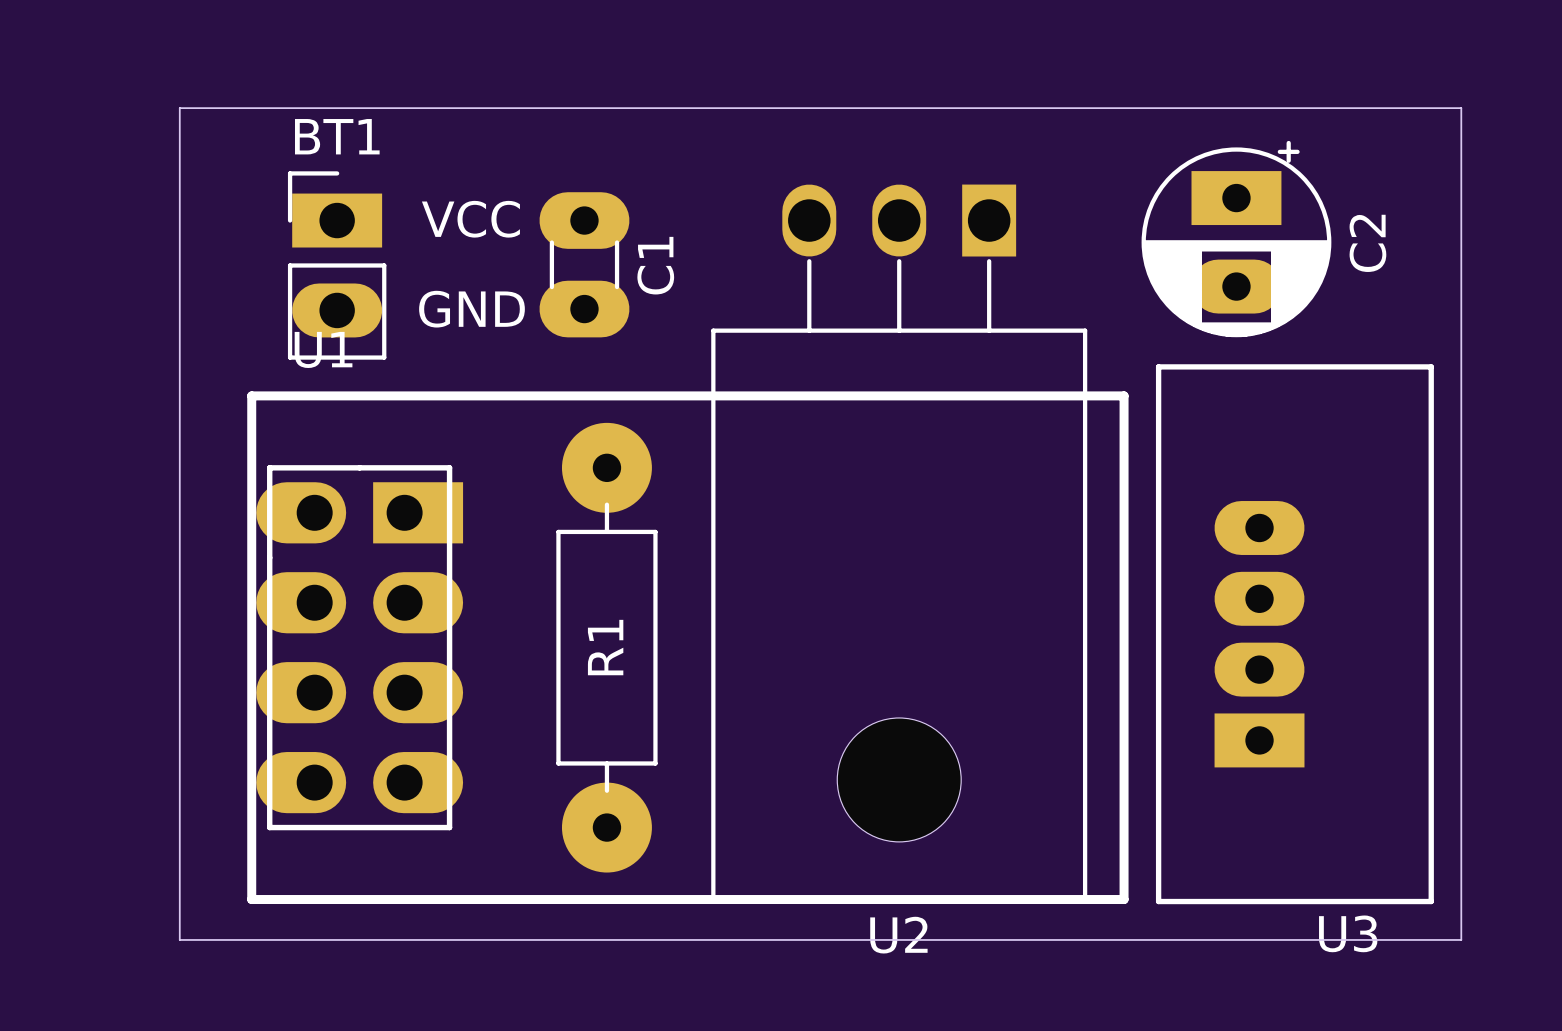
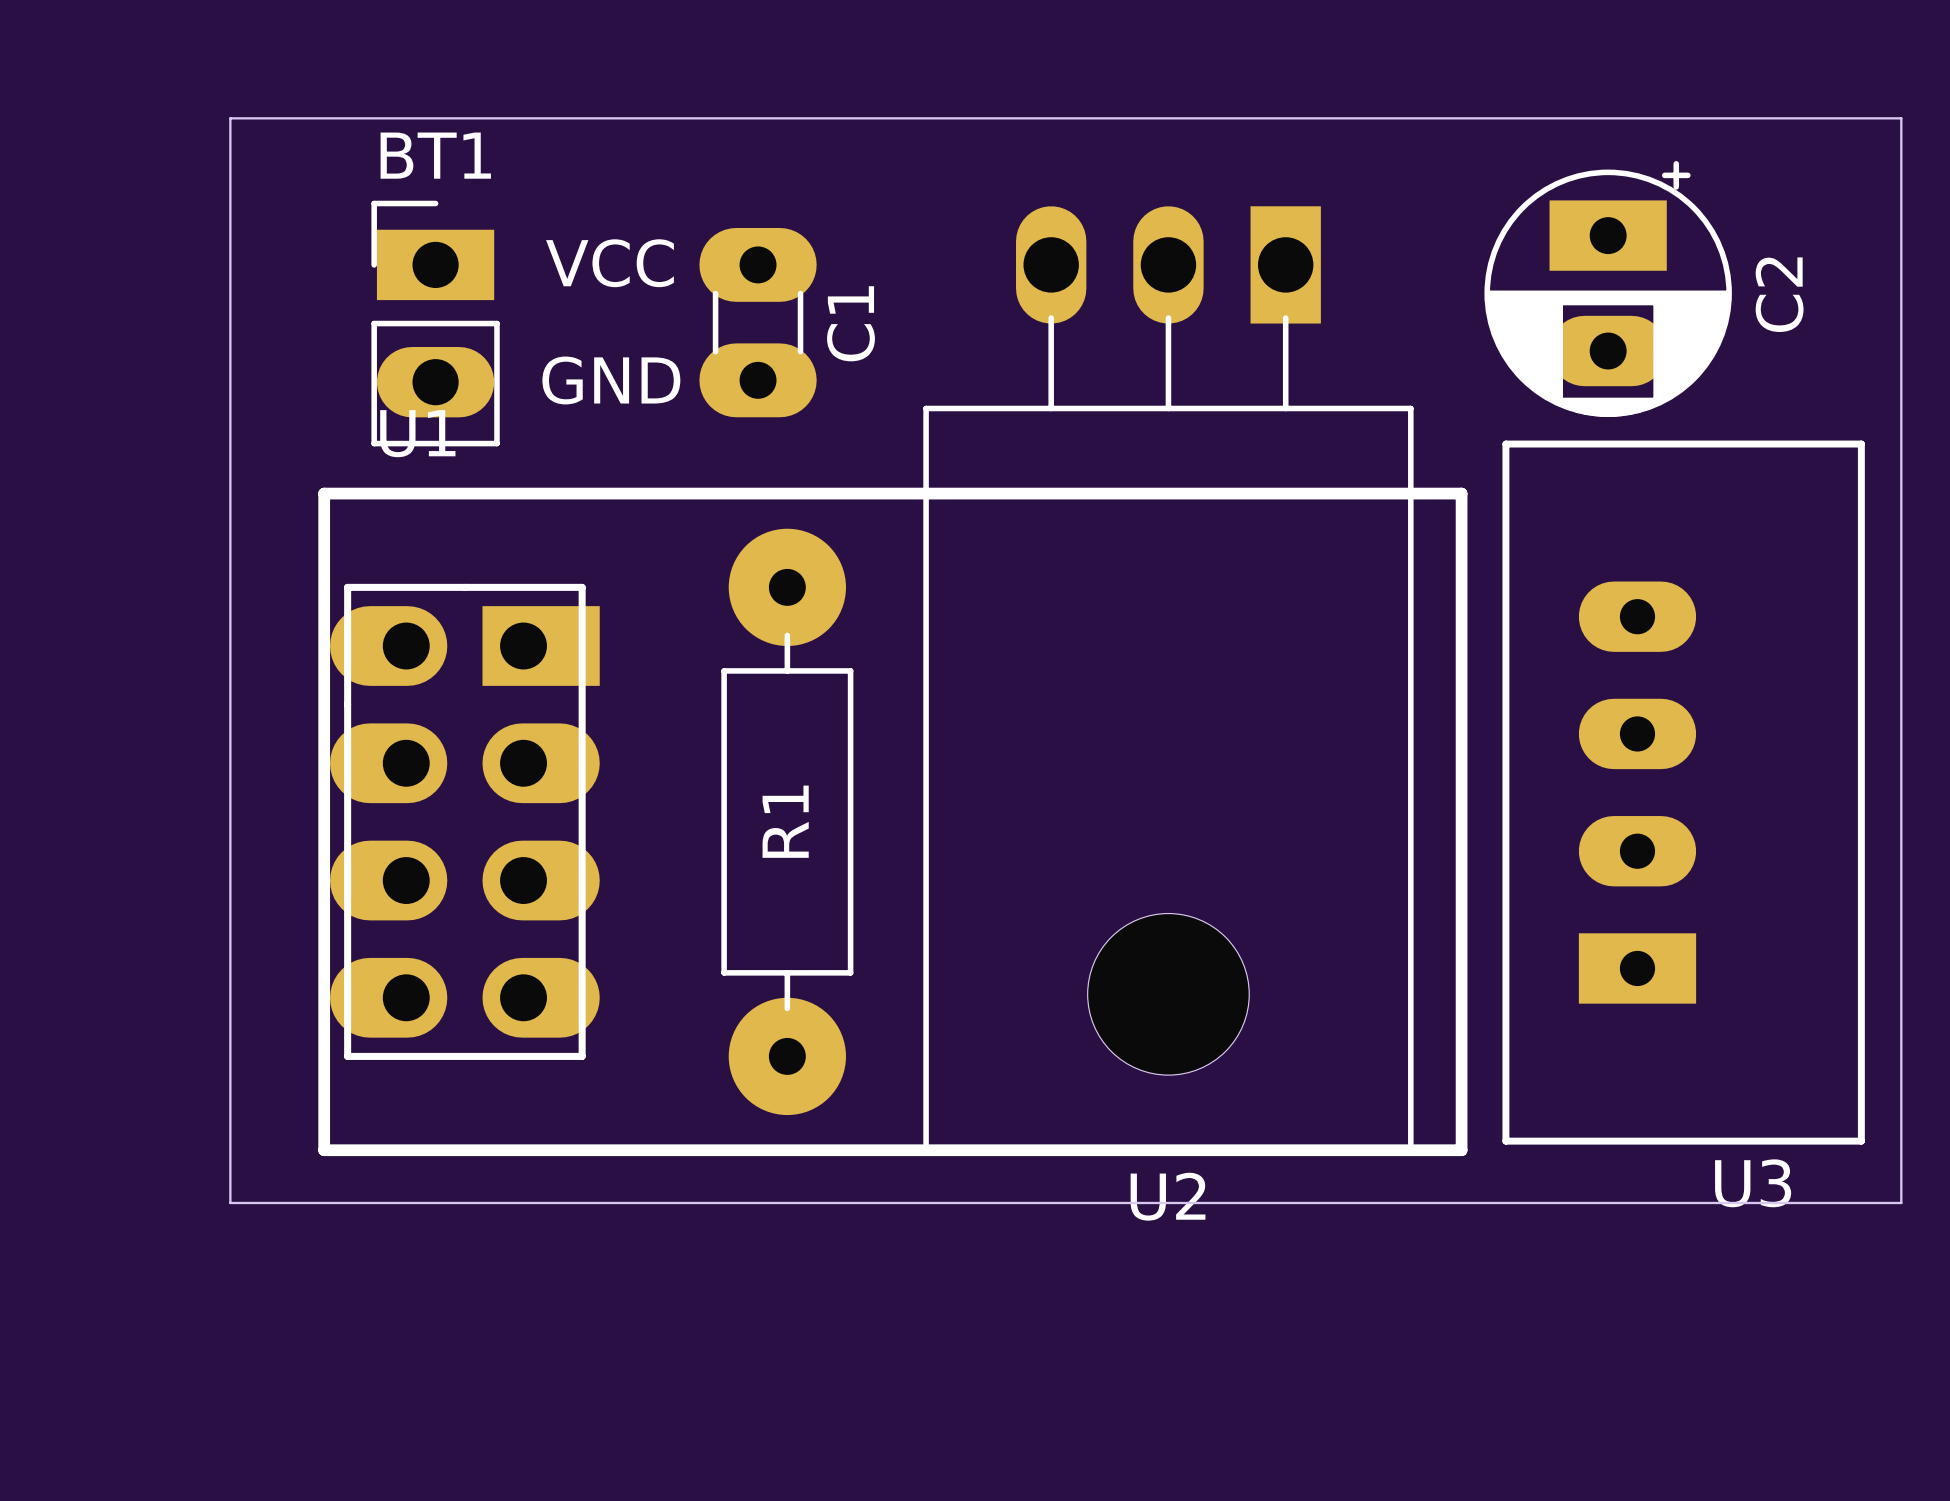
U2 footprint: [711, 184, 1088, 904] -> [923, 206, 1414, 1155]
U3 footprint: [1155, 364, 1434, 905] -> [1502, 440, 1865, 1145]

